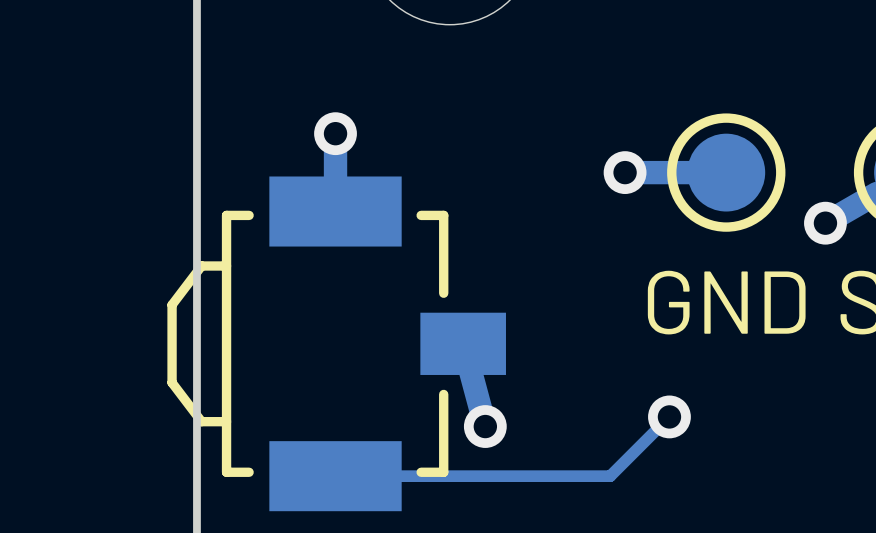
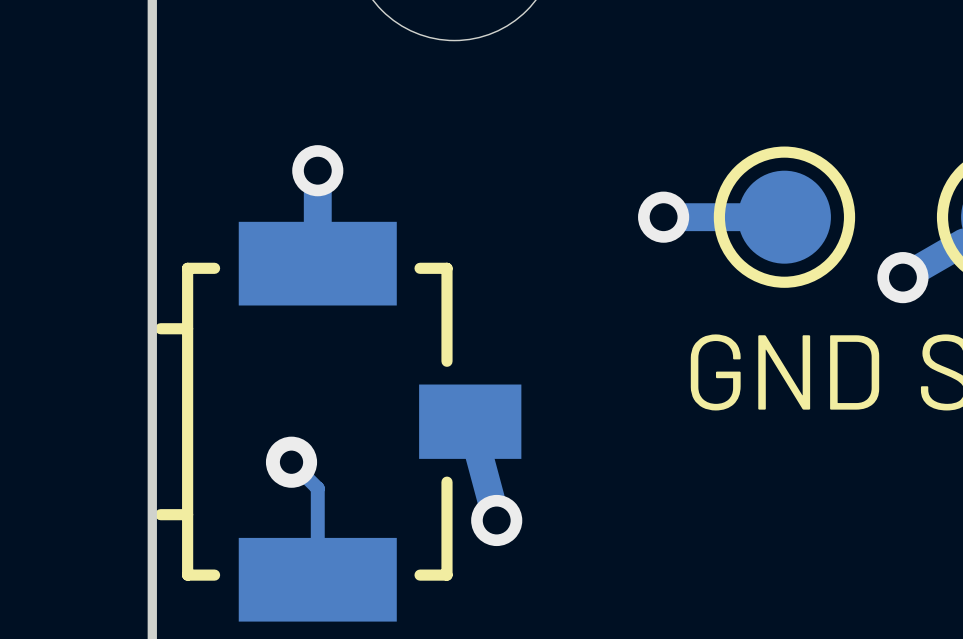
part footprint: [167, 176, 506, 512] -> [155, 221, 522, 622]
via: none -> (291, 462)
track: (669, 416) (610, 476) (335, 476) -> (291, 462) (317, 488) (317, 579)
via: (669, 416) -> none

